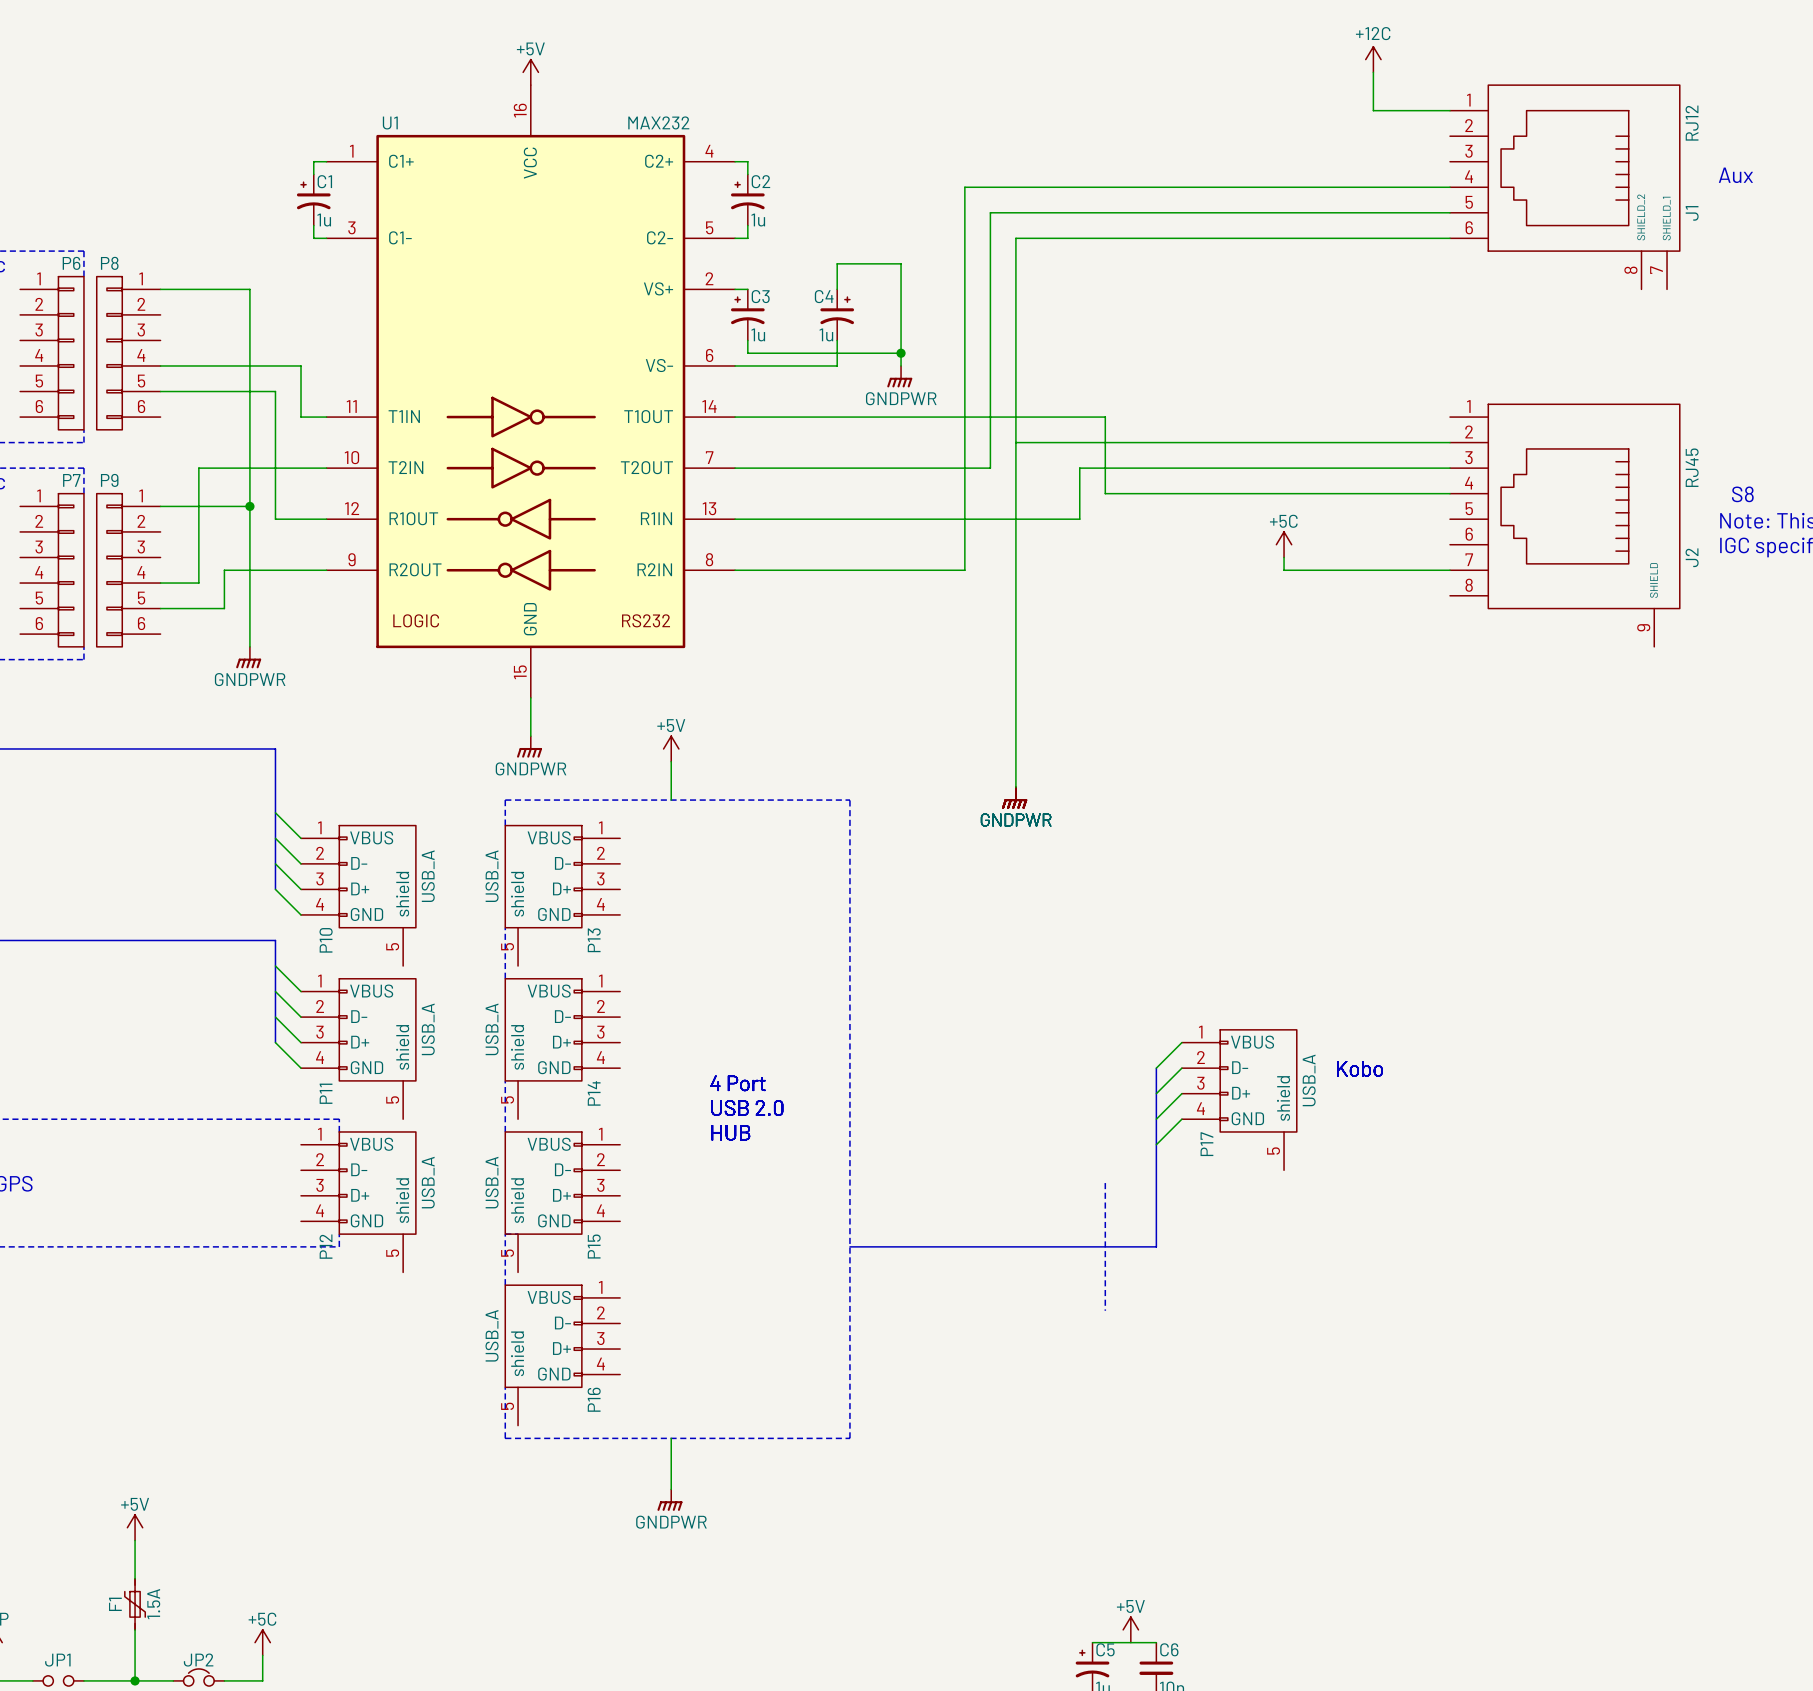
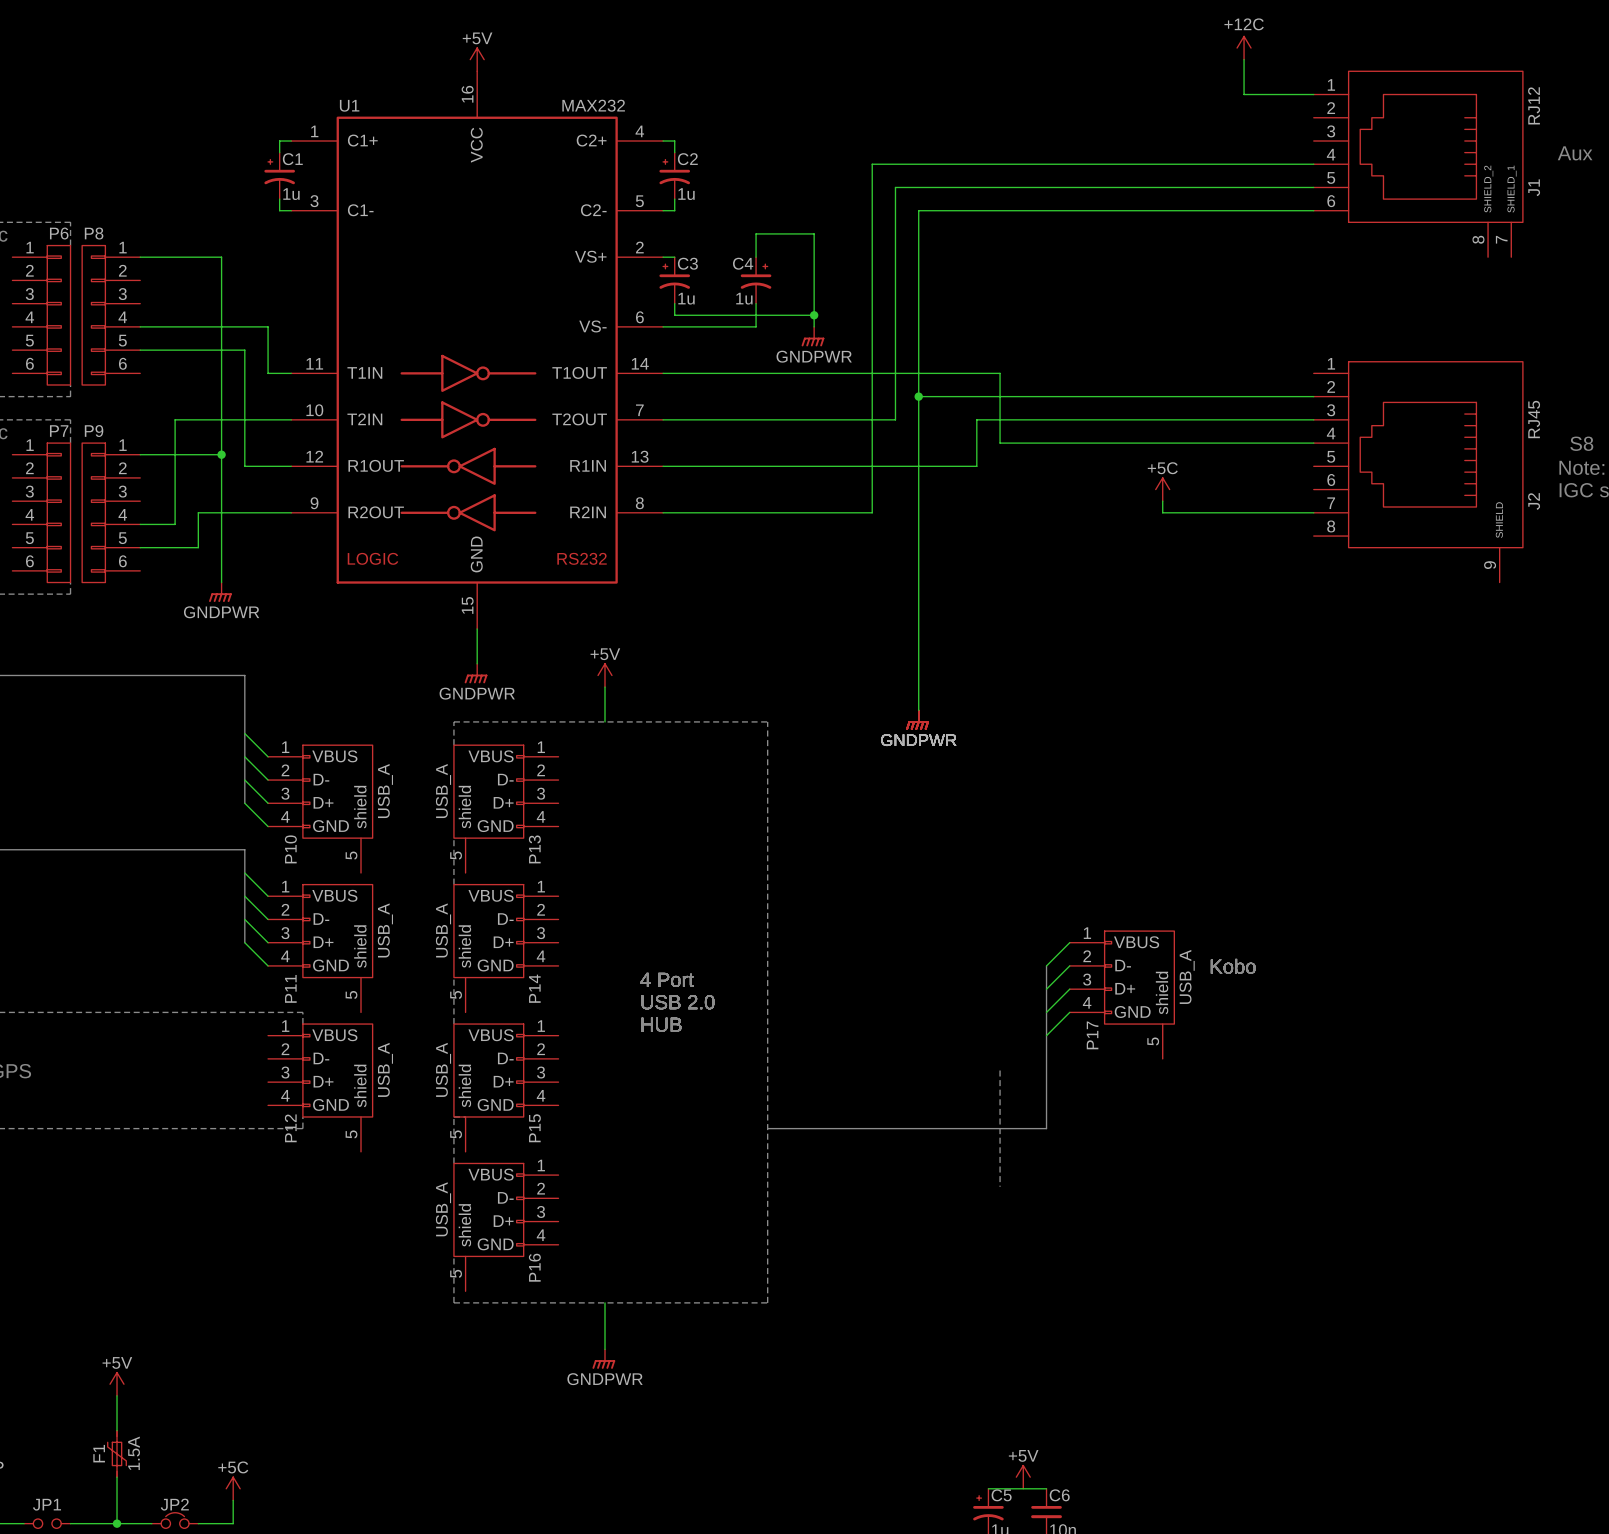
junction: none -> (918, 396)

